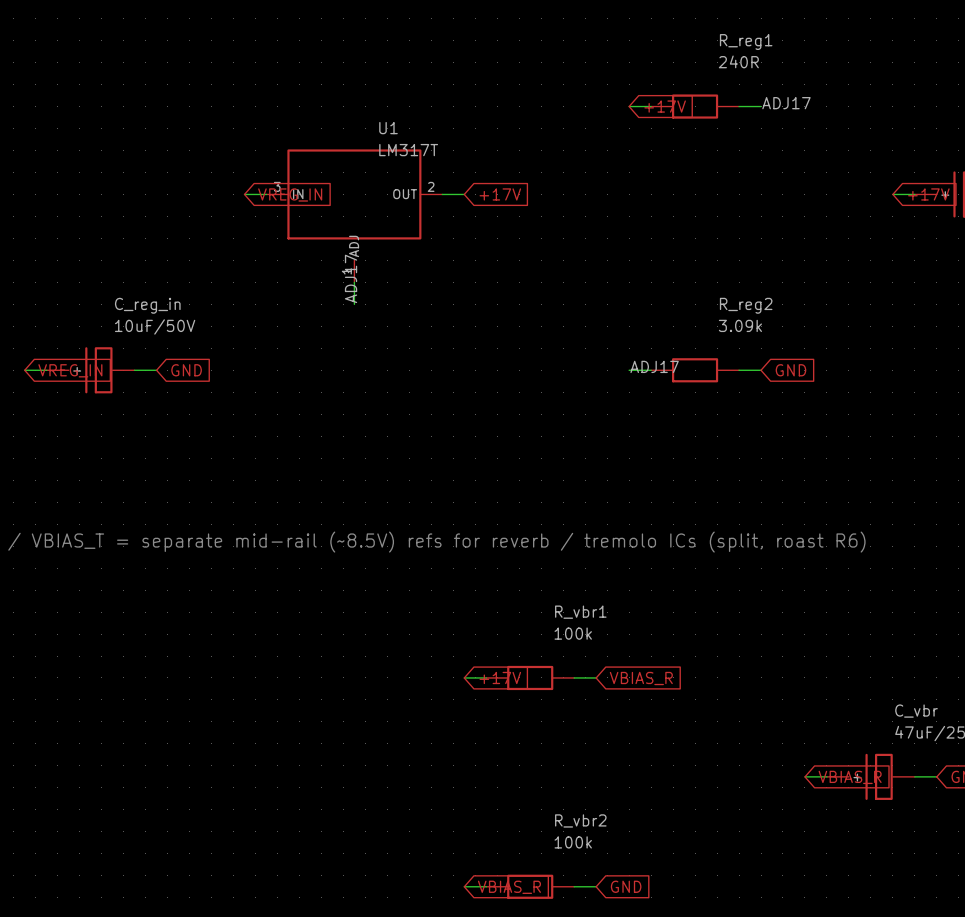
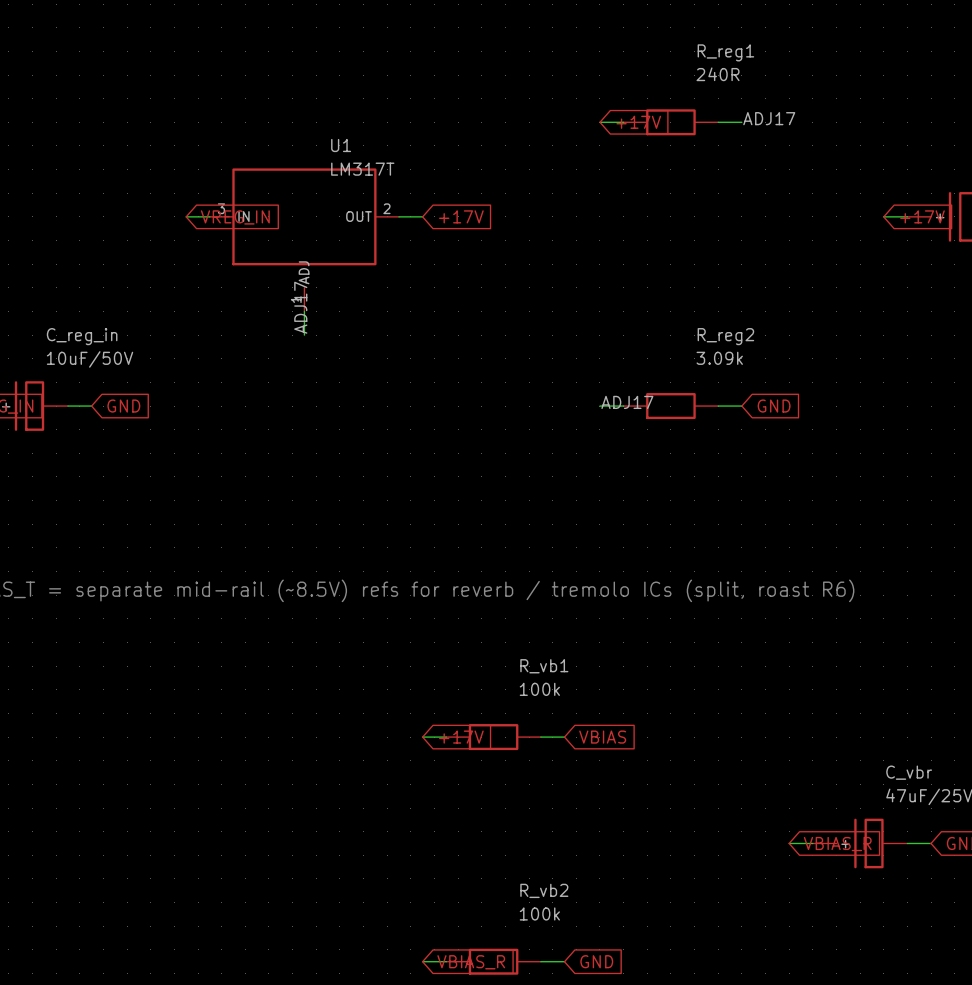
R_vbr1 name: R_vbr1 (580, 612) -> R_vb1 (544, 666)
global label: VBIAS_R (641, 678) -> VBIAS (602, 737)
R_vbr2 name: R_vbr2 (580, 820) -> R_vb2 (544, 890)

